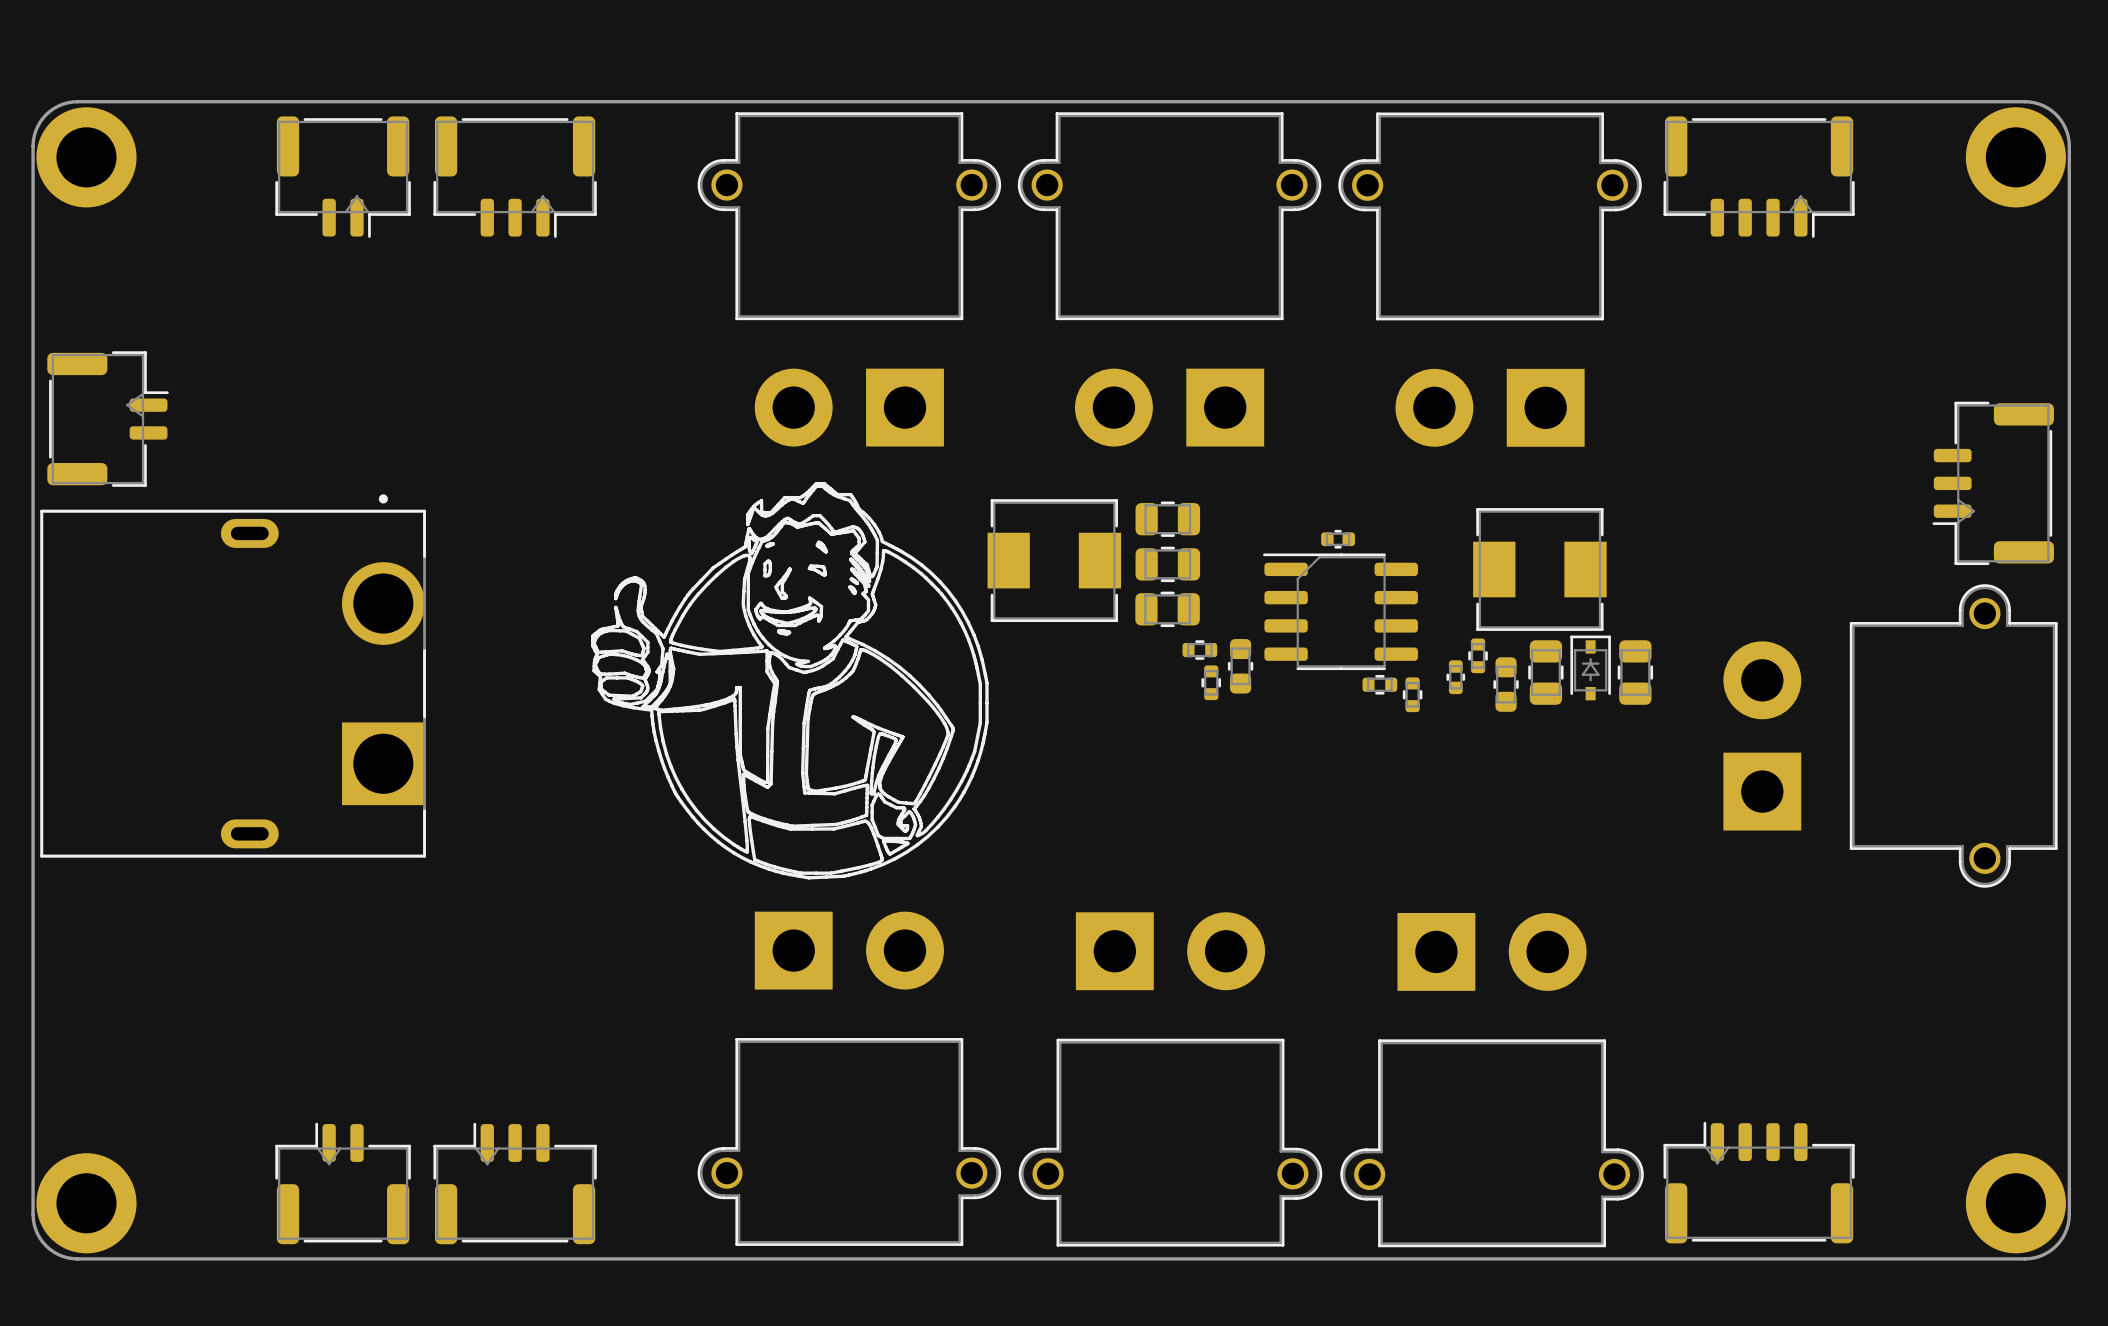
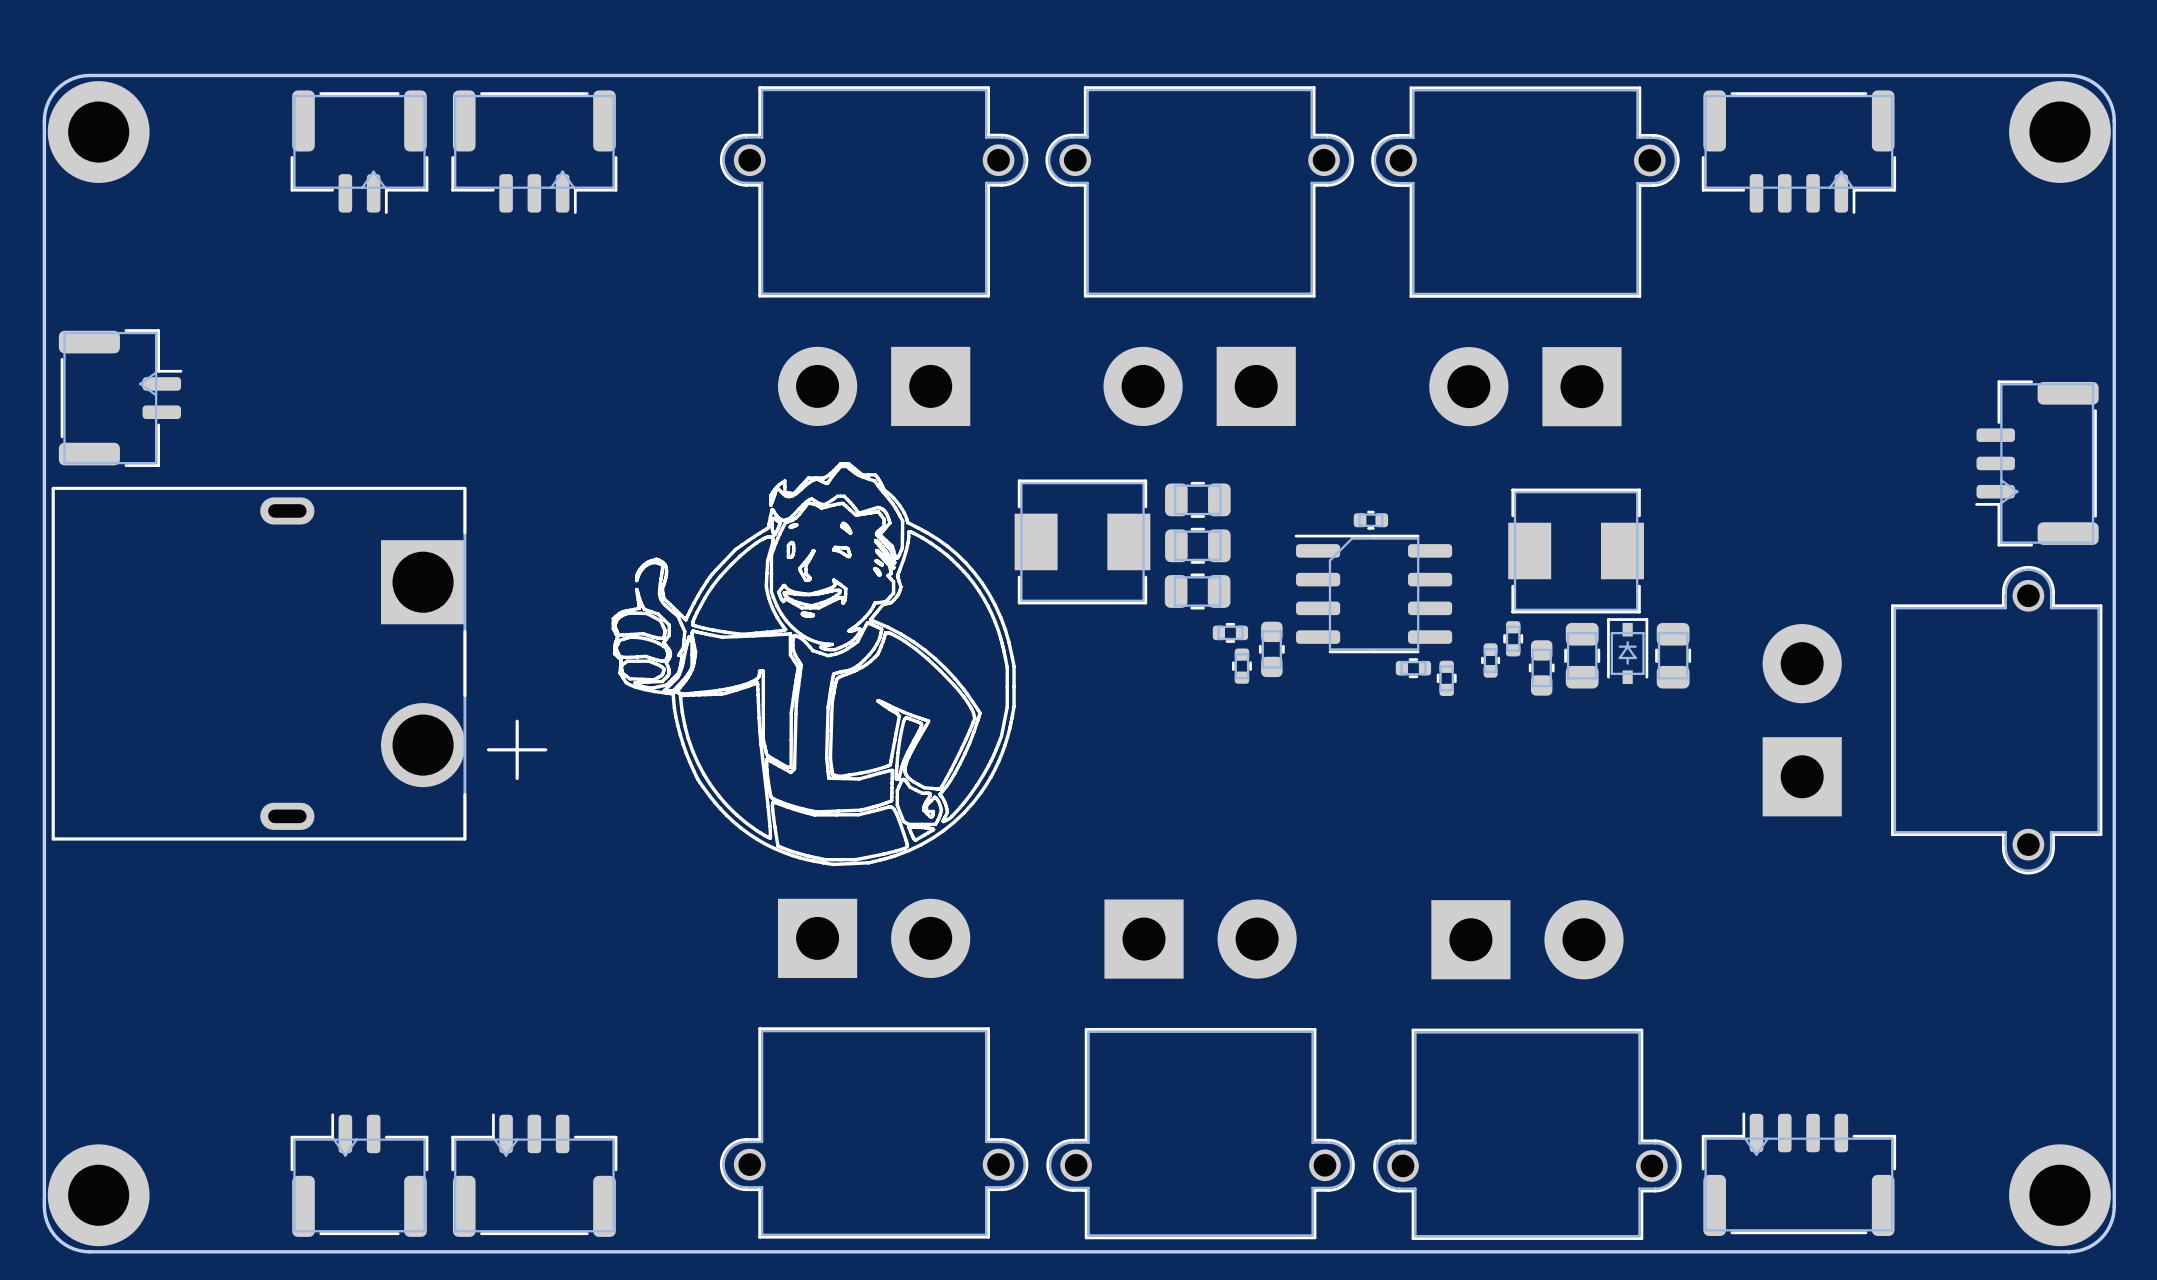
part: (233, 676) -> none
part: none -> (299, 663)

